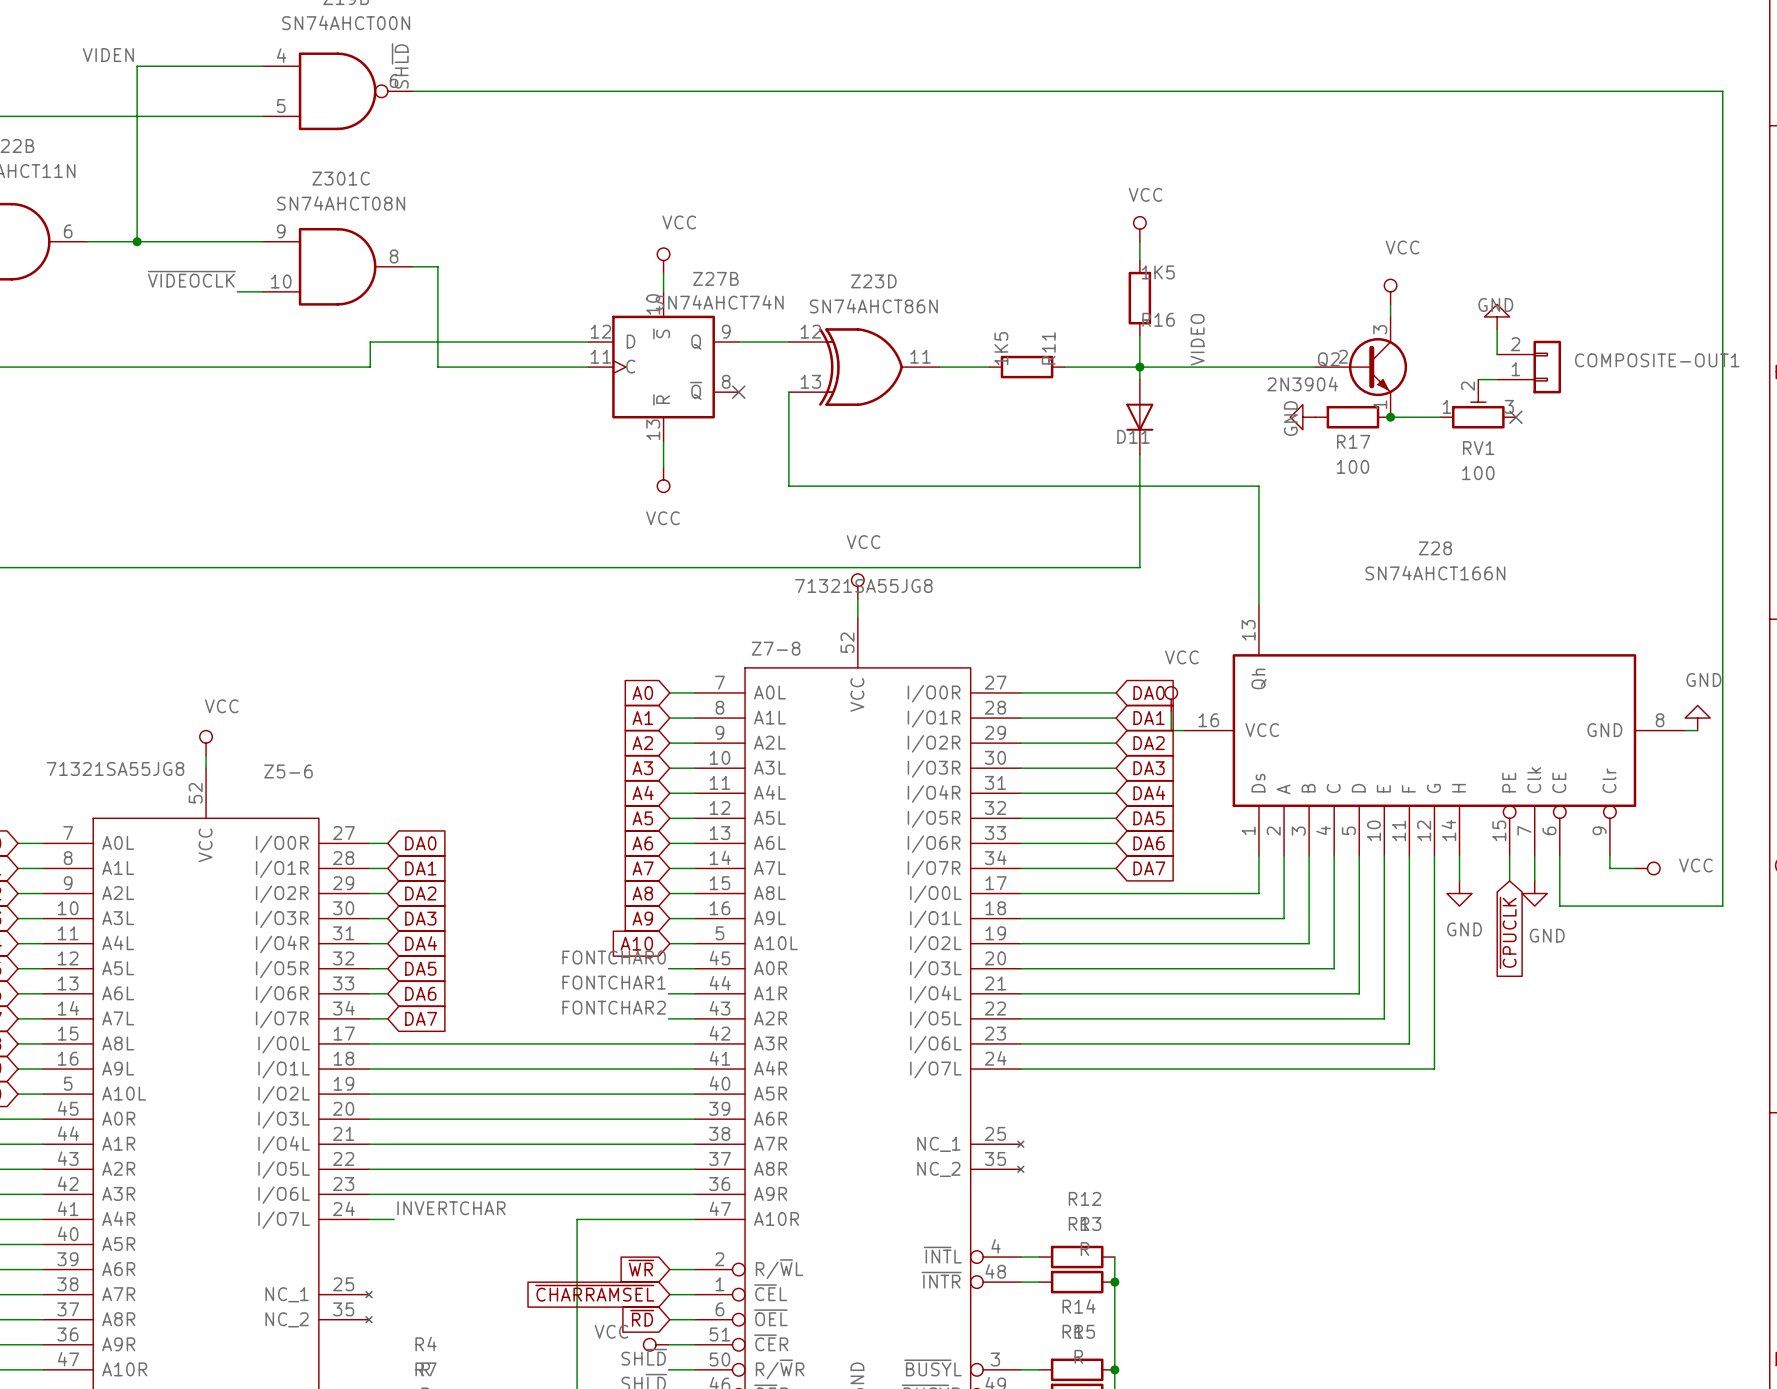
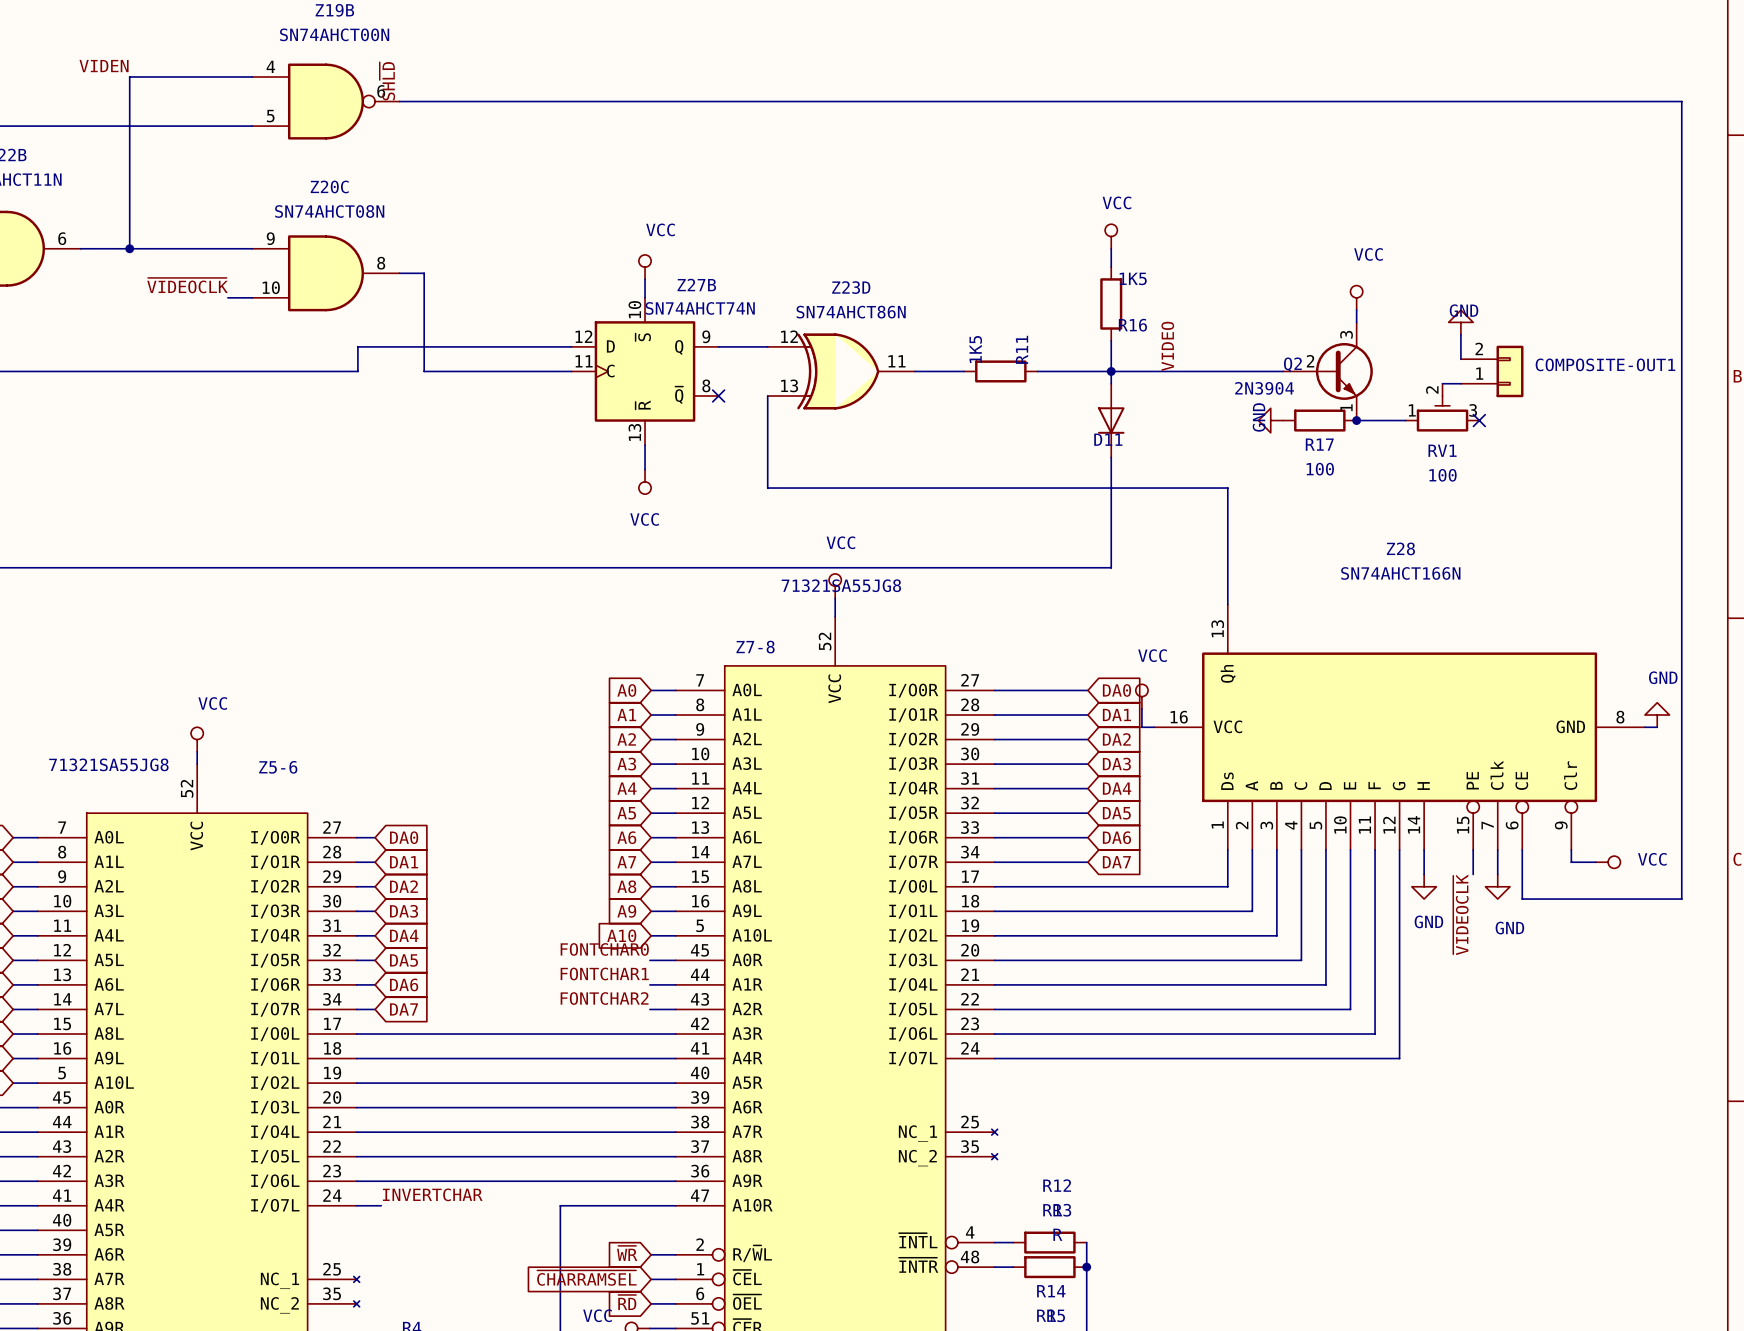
Z301C name: Z301C (341, 178) -> Z20C (329, 186)
label: none -> ~{VIDEOCLK} (1460, 914)
global label: ~{CPUCLK} (1508, 932) -> none

